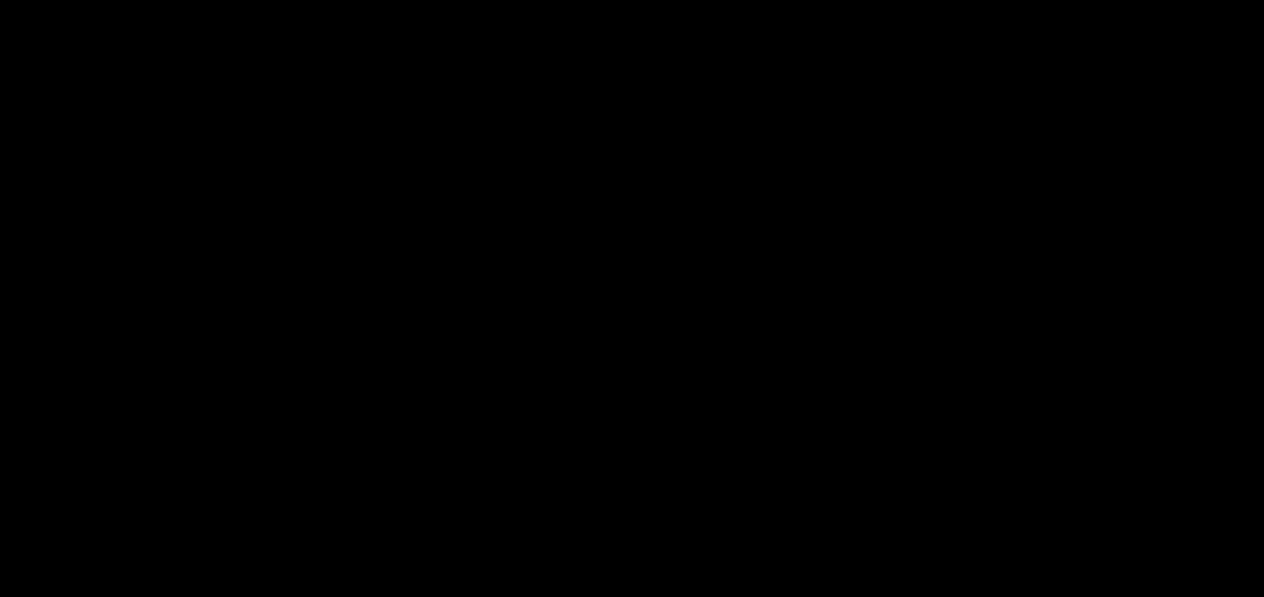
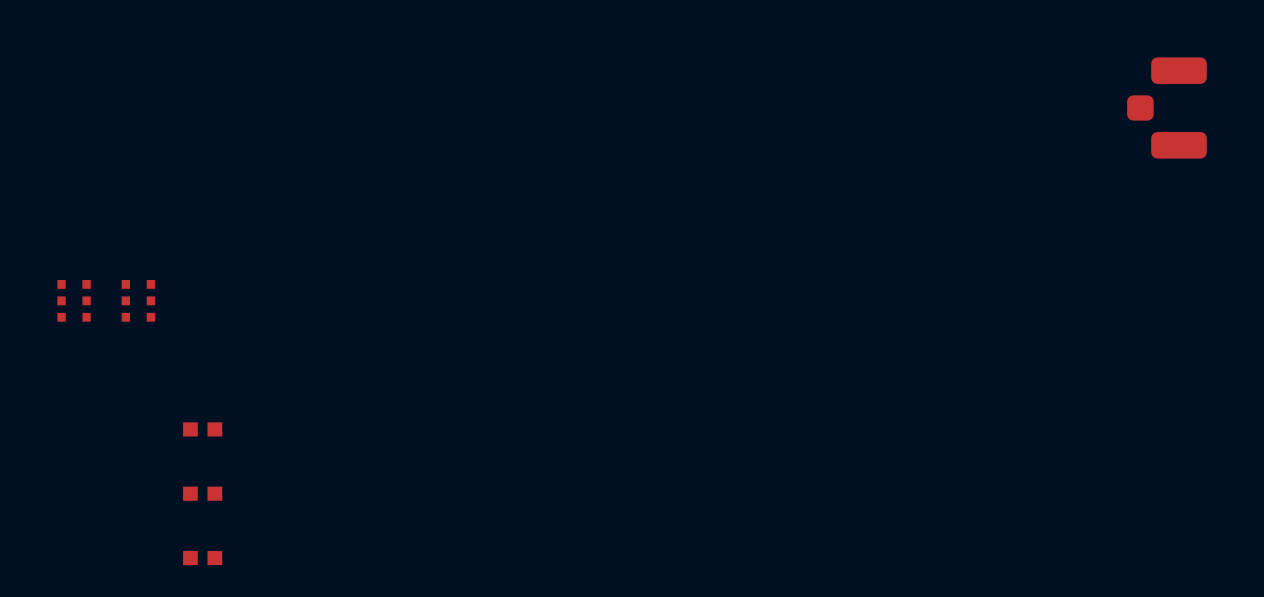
part: none -> (1166, 107)
part: none -> (74, 300)
part: none -> (138, 300)
part: none -> (202, 429)
part: none -> (202, 493)
part: none -> (202, 558)

